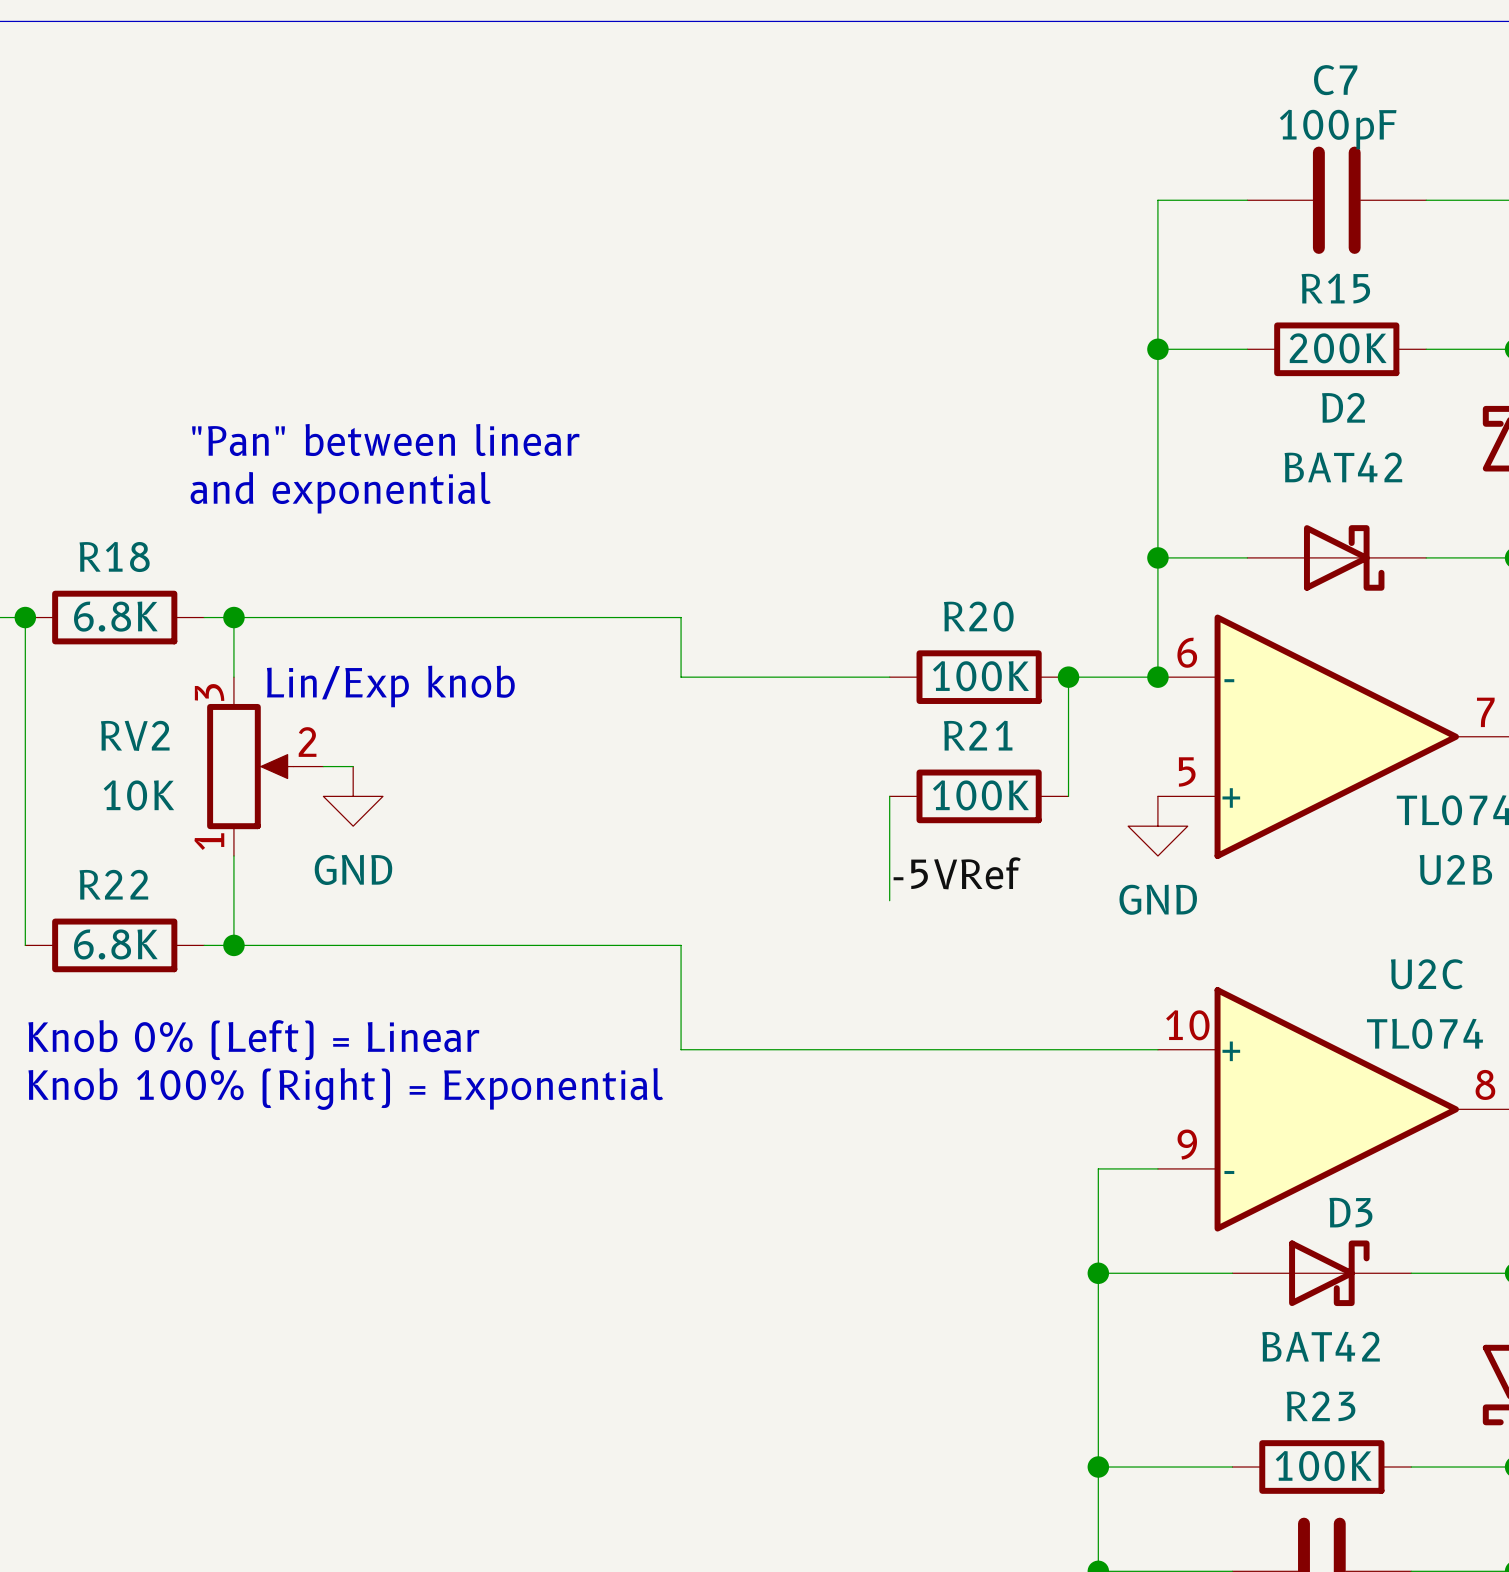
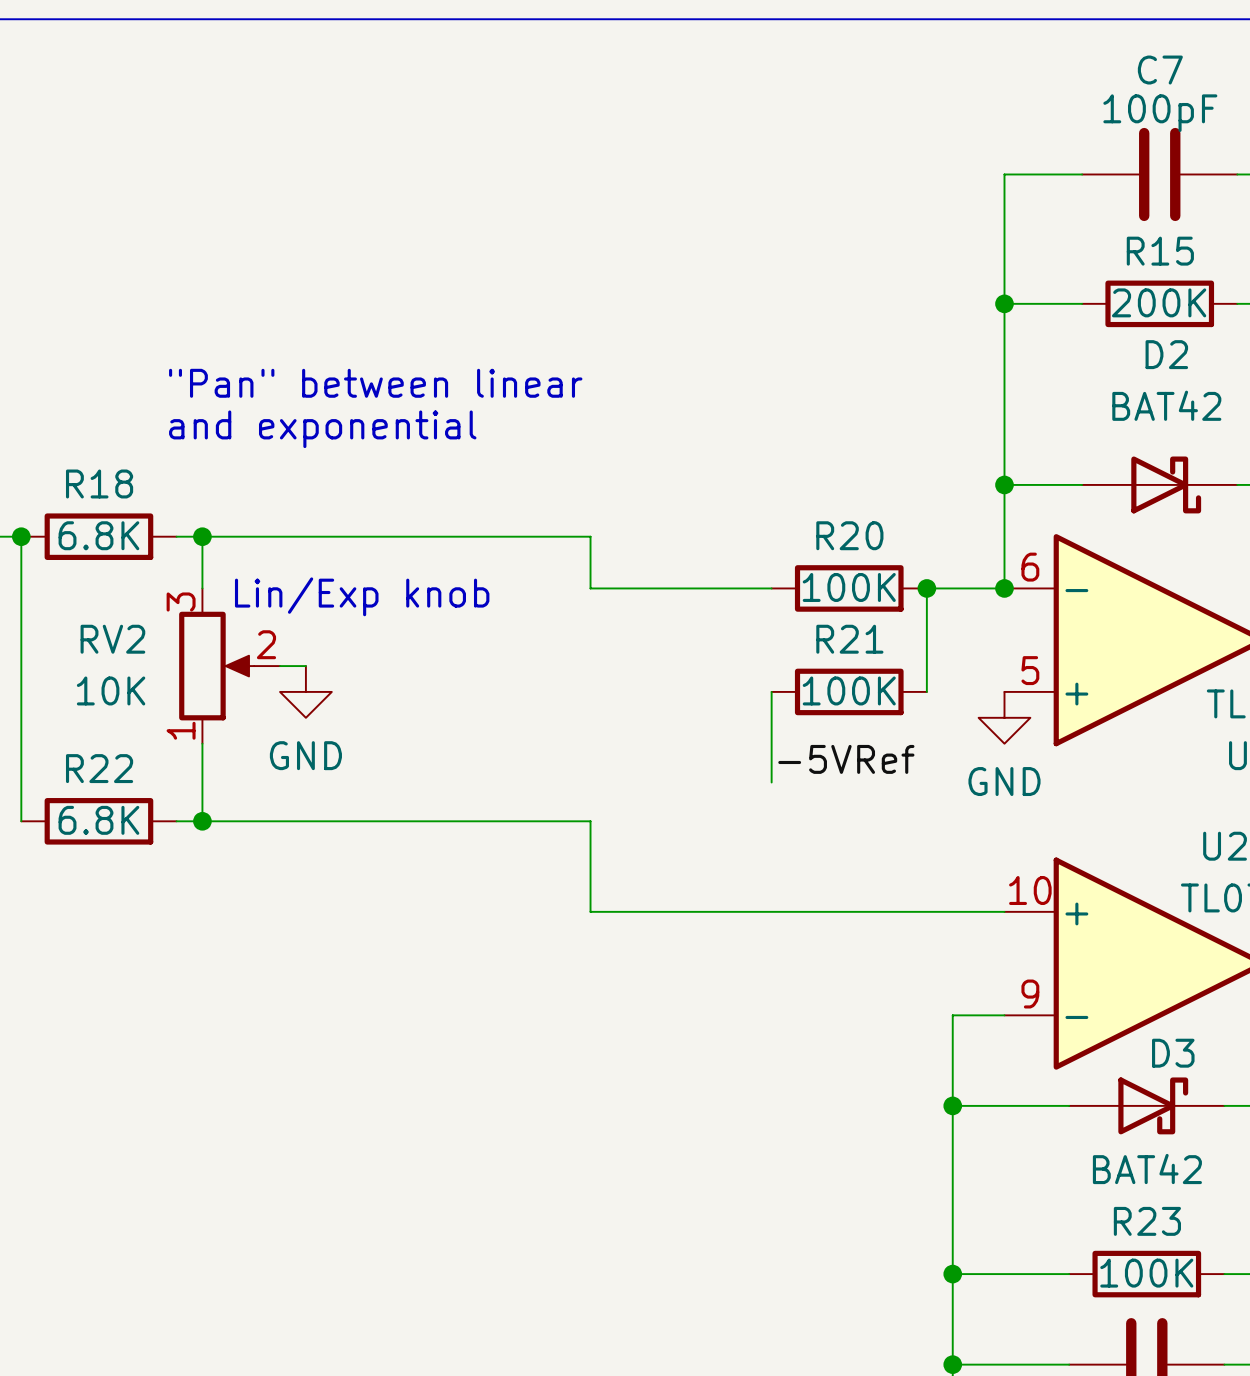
text: Knob 0% (Left) = Linear (253, 1040) -> none
text: Knob 100% (Right) = Exponential (345, 1089) -> none

